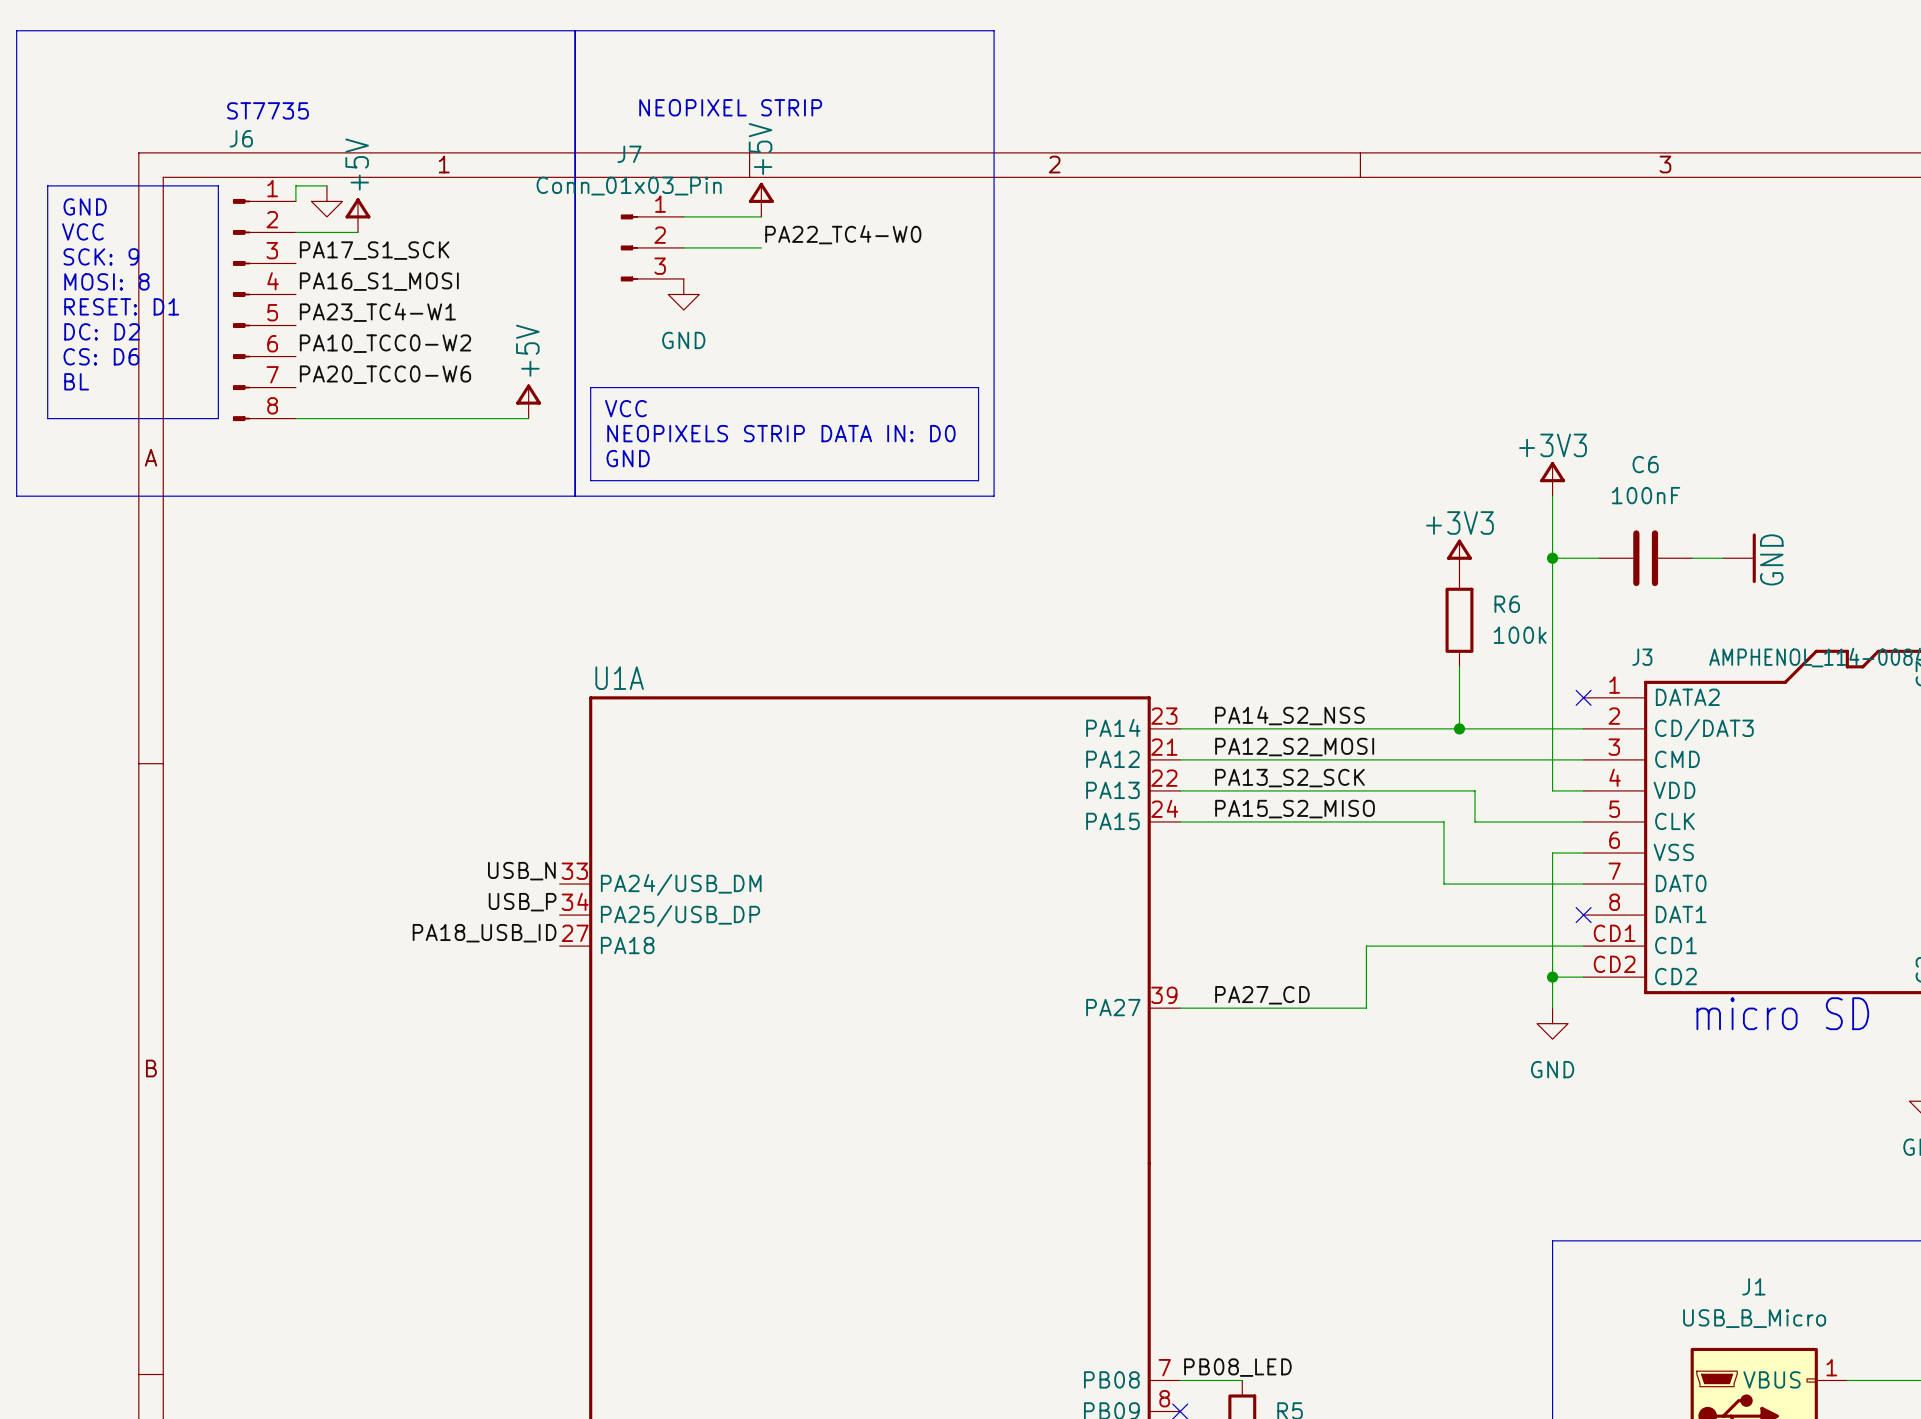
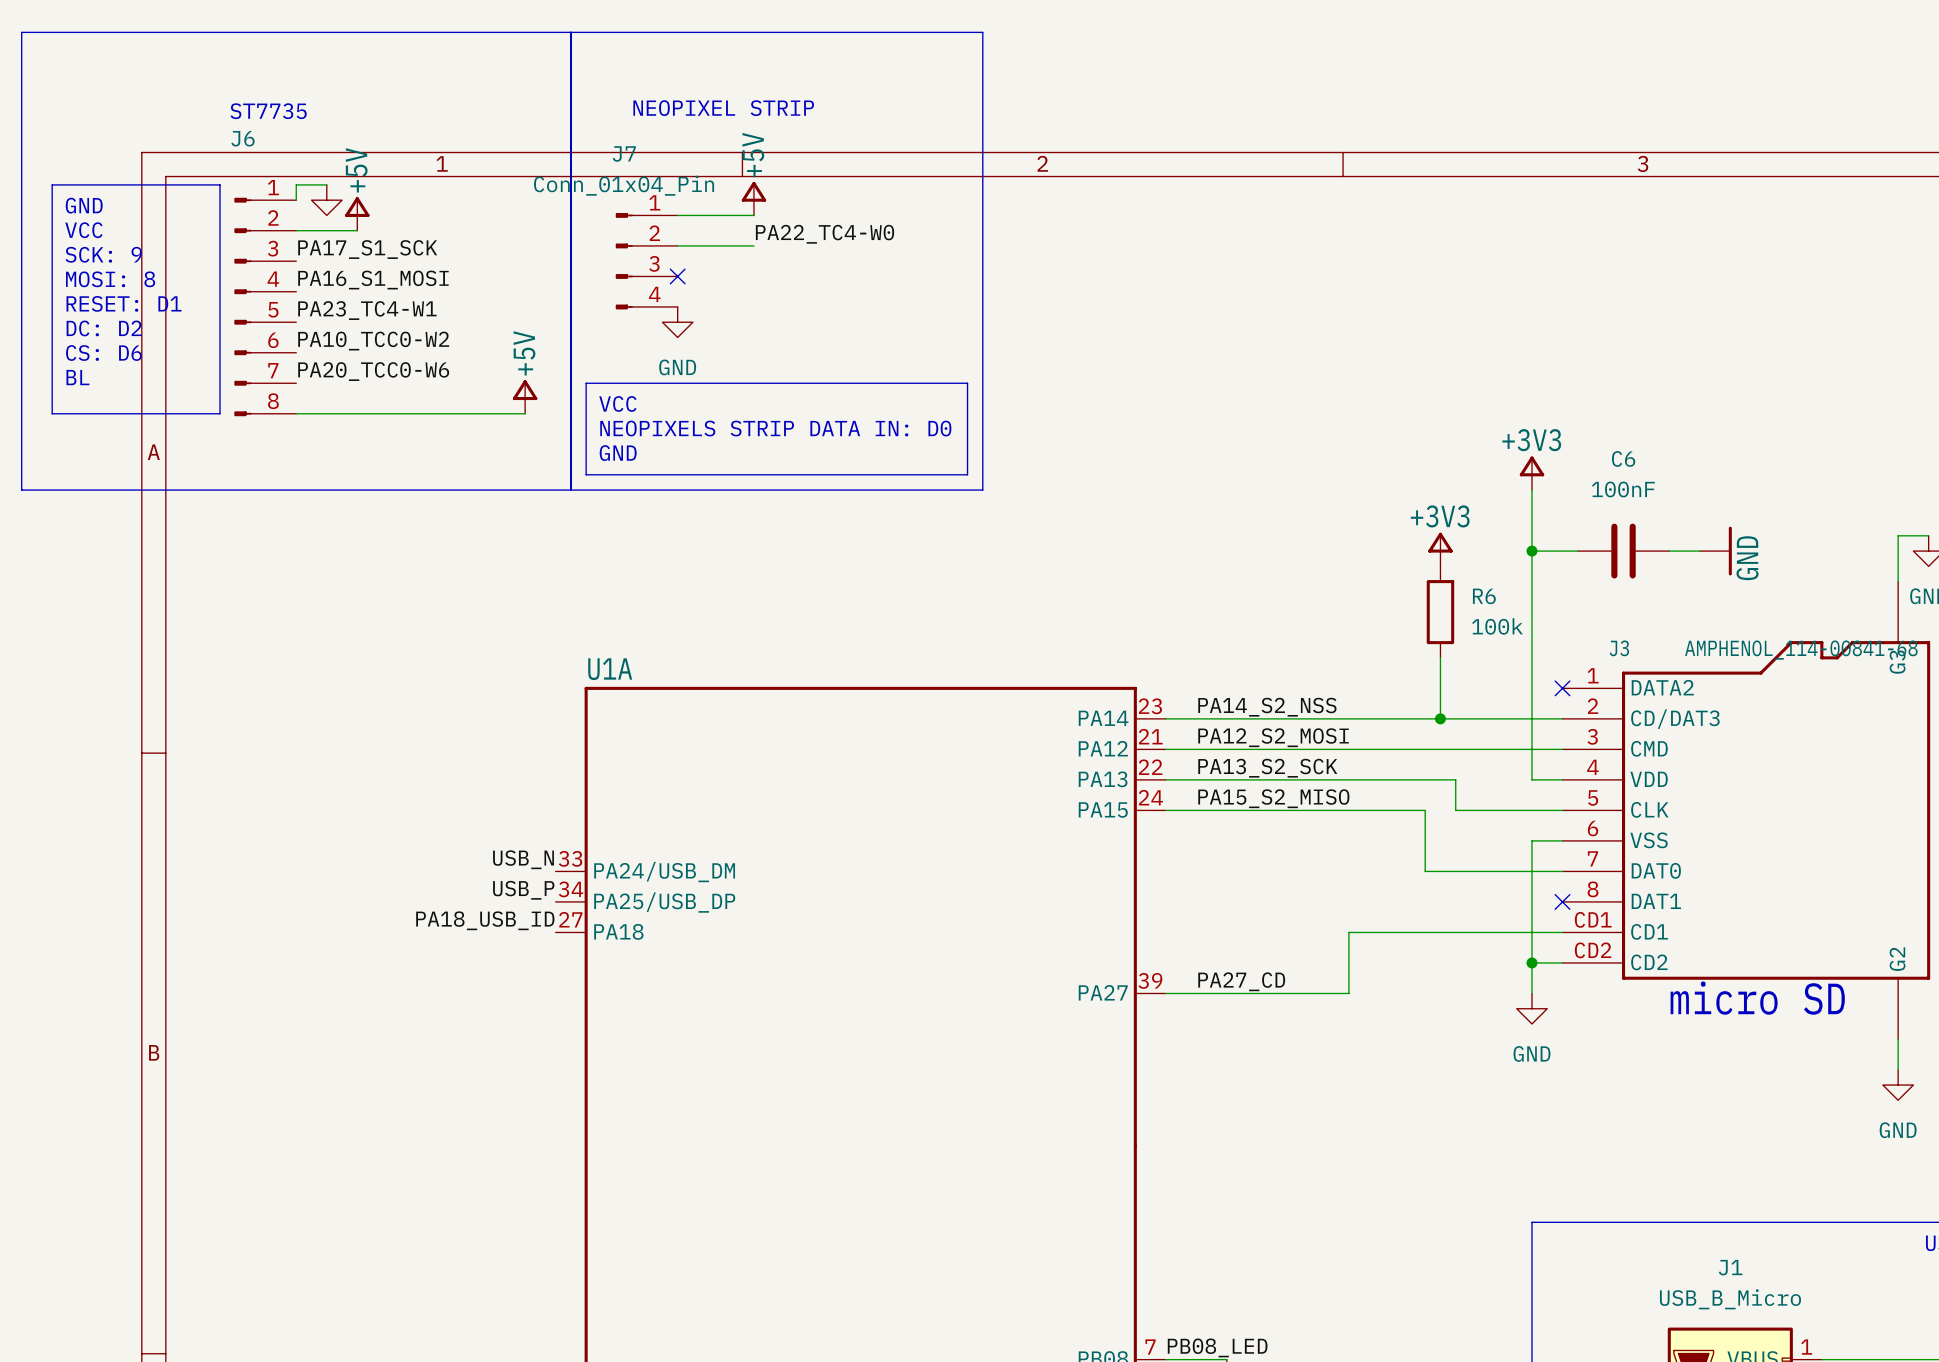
J7 value: Conn_01x03_Pin (629, 186) -> Conn_01x04_Pin (624, 185)
J7 symbol: [620, 214, 684, 282] -> [615, 213, 678, 310]
no-connect mark: none -> (677, 276)
power symbol position: GND (683, 294) -> GND (677, 322)

